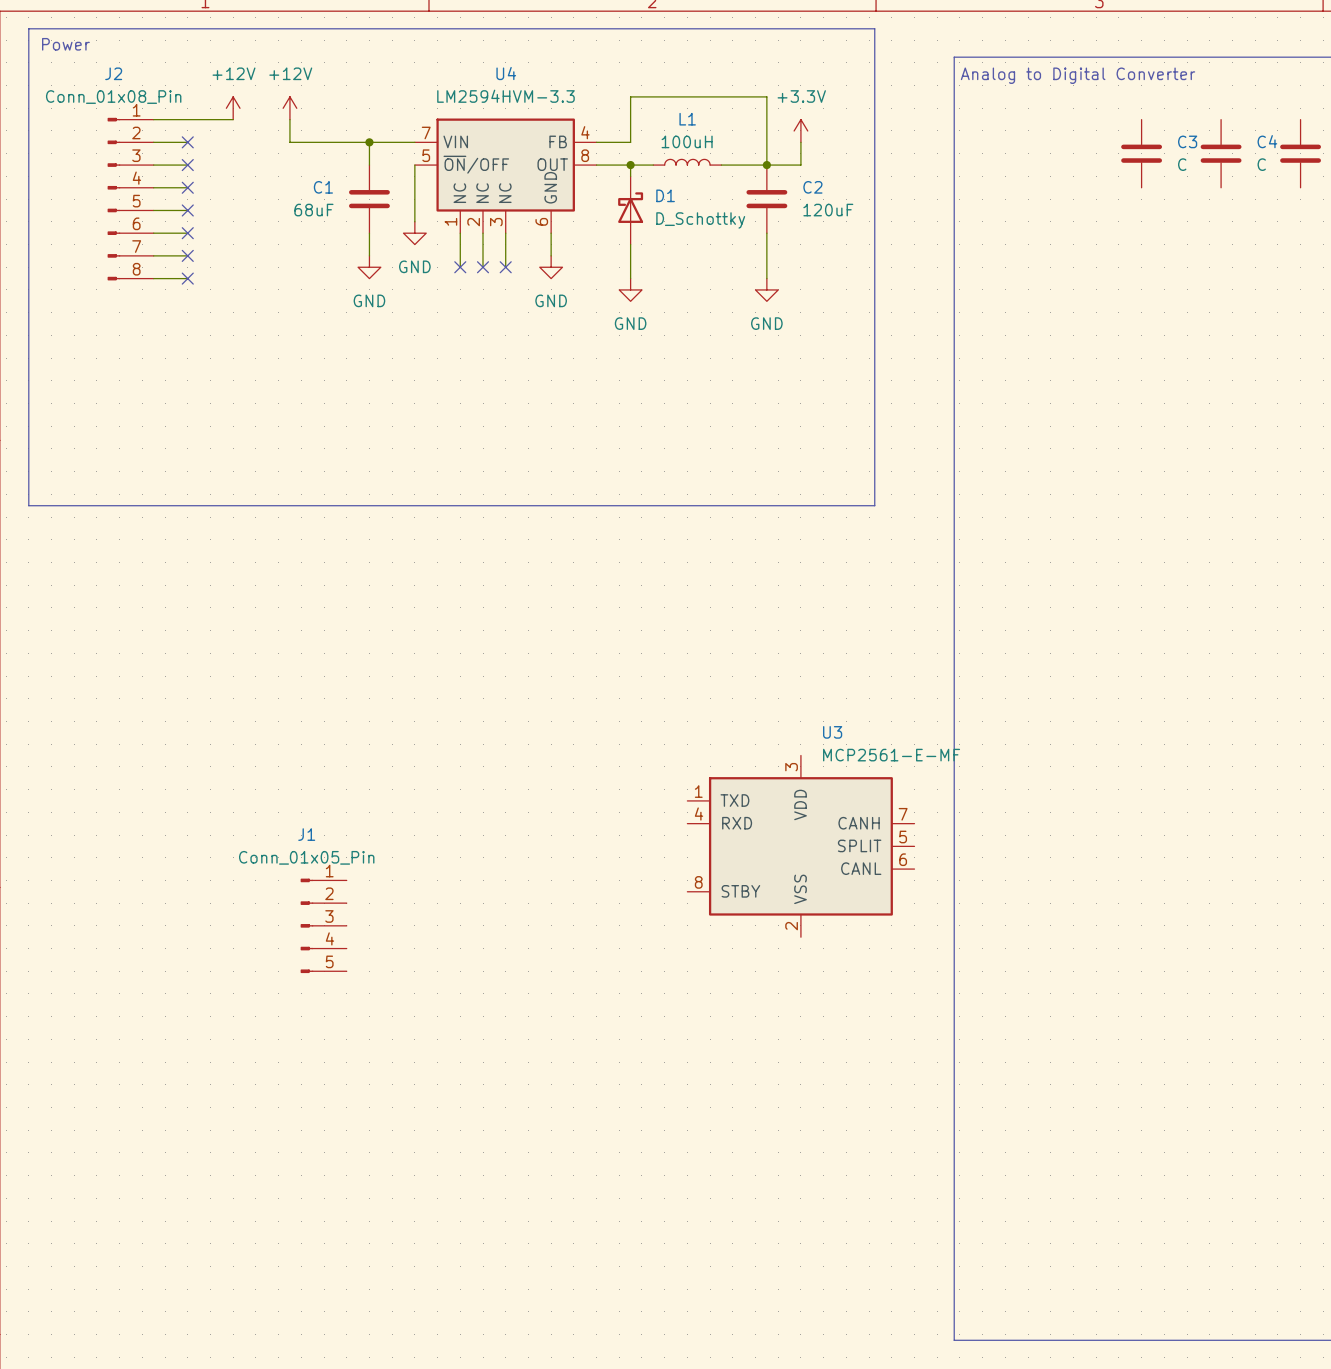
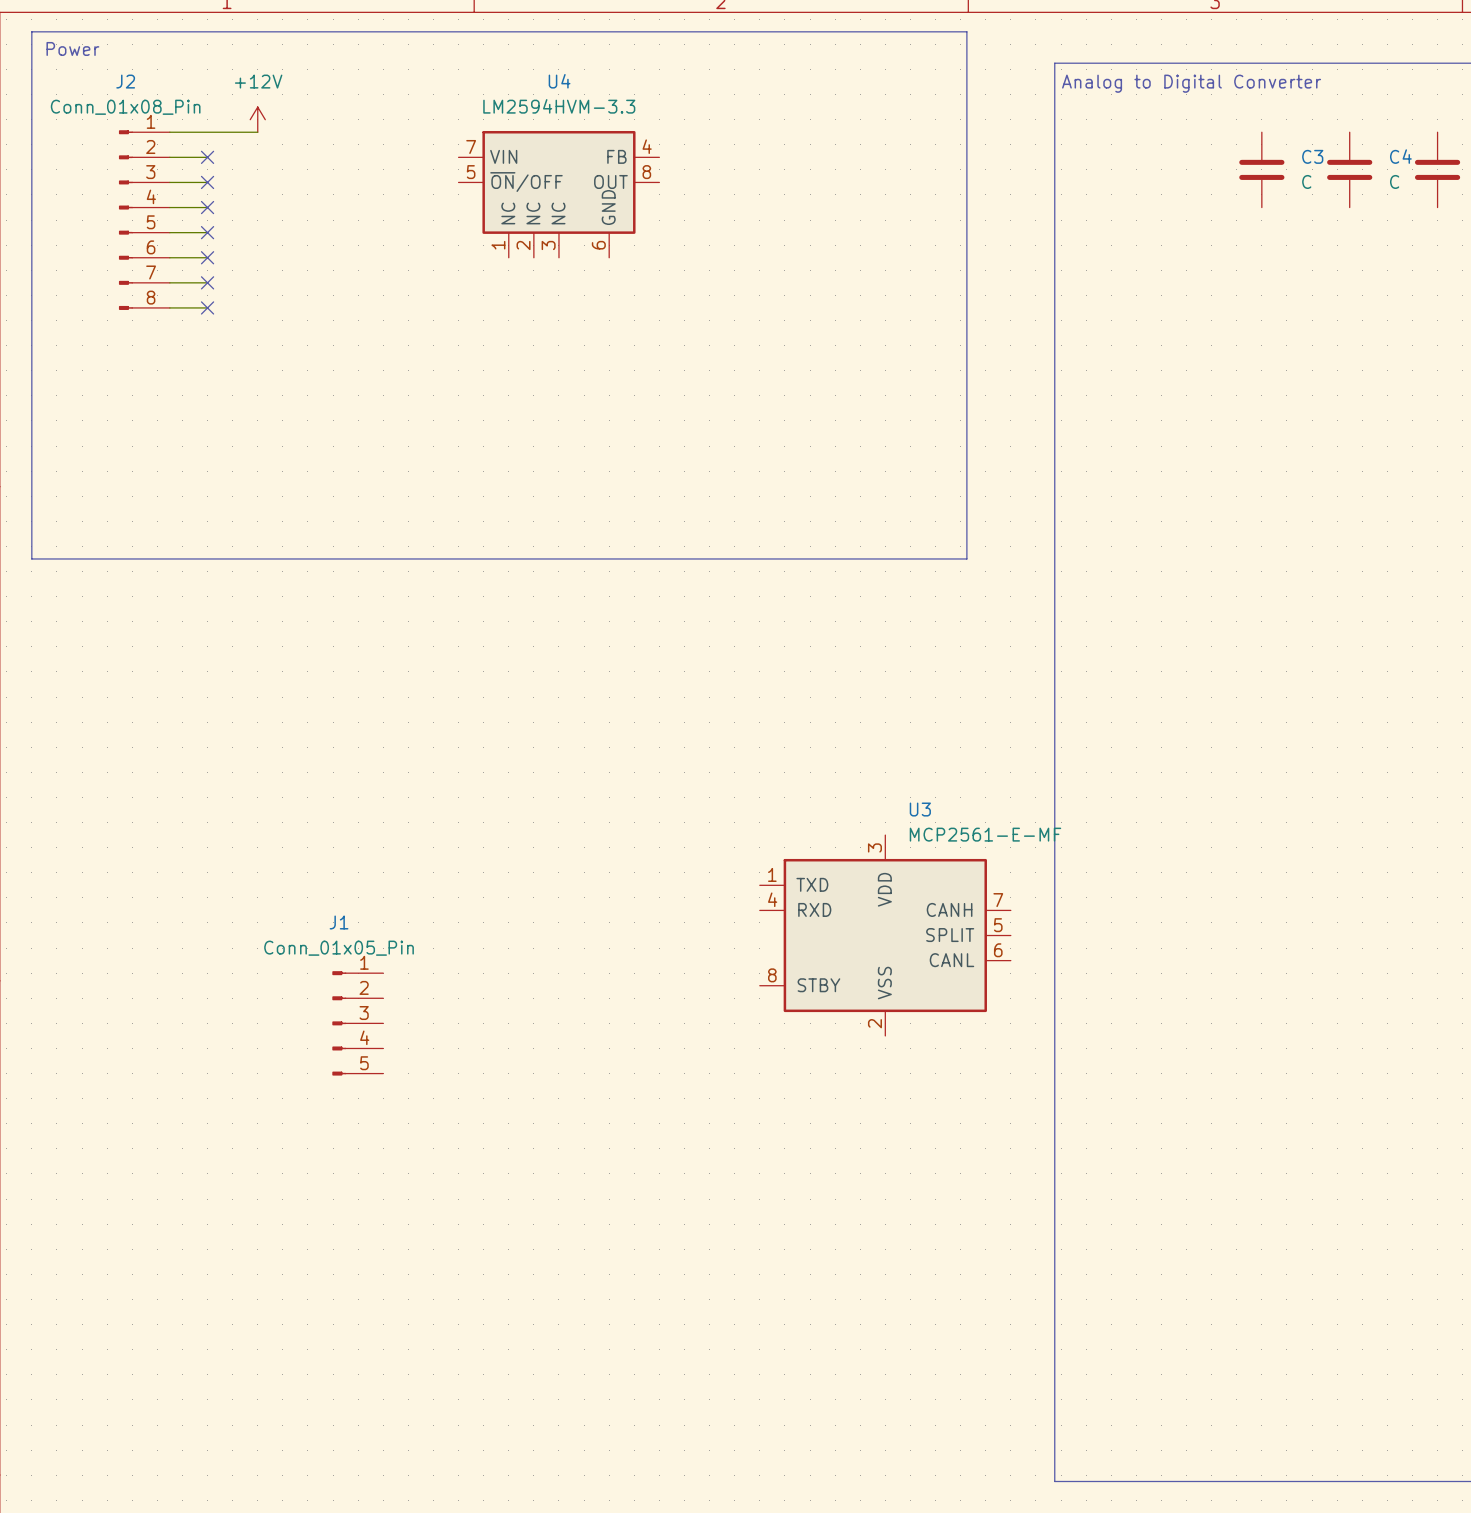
power symbol: +12V (289, 108) -> none
wire: (289, 119) (289, 142) (414, 142) -> none
power symbol: +3.3V (800, 130) -> none
wire: (369, 142) (369, 165) -> none
junction: (369, 142) -> none
wire: (596, 142) (630, 142) (630, 96) (766, 96) (766, 165) -> none
wire: (800, 142) (800, 165) (721, 165) -> none
L1: 100uH (687, 162) -> none
wire: (414, 165) (414, 221) -> none
wire: (596, 165) (653, 165) -> none
wire: (630, 165) (630, 176) -> none
junction: (630, 165) -> none
junction: (766, 165) -> none
C1: 68uF (369, 199) -> none
C2: 120uF (766, 199) -> none
D1: D_Schottky (630, 210) -> none
wire: (369, 233) (369, 255) -> none
power symbol: GND (414, 233) -> none
wire: (460, 233) (460, 267) -> none
wire: (483, 233) (483, 267) -> none
wire: (505, 233) (505, 267) -> none
wire: (551, 233) (551, 255) -> none
wire: (766, 233) (766, 278) -> none
wire: (630, 244) (630, 278) -> none
power symbol: GND (369, 267) -> none
no-connect mark: (460, 267) -> none
no-connect mark: (483, 267) -> none
no-connect mark: (505, 267) -> none
power symbol: GND (551, 267) -> none
power symbol: GND (630, 289) -> none
power symbol: GND (766, 289) -> none

